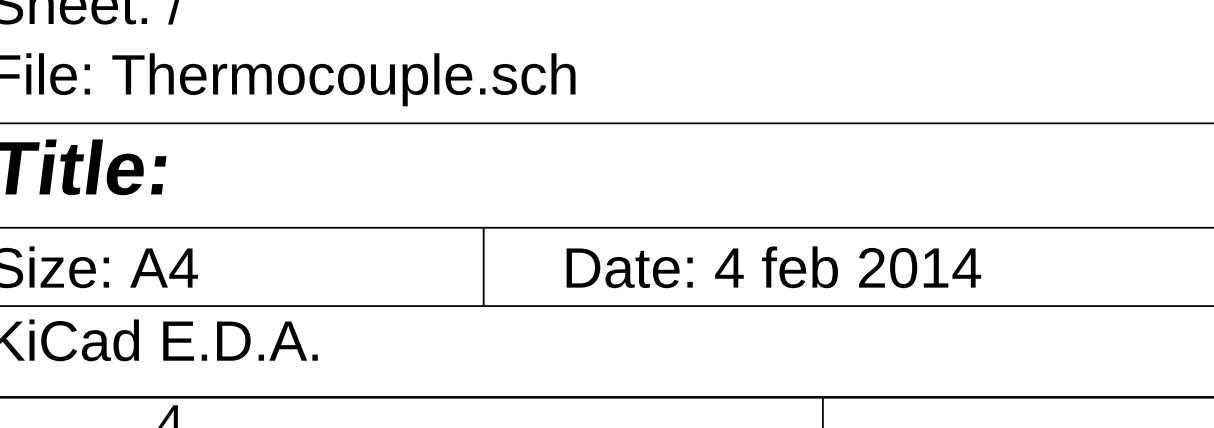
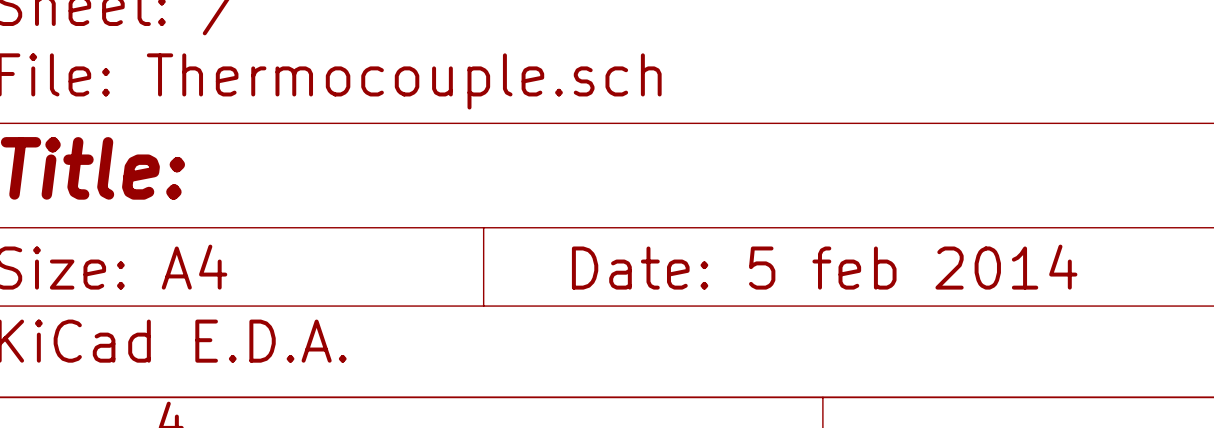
title block: Date: 4 feb 2014 (773, 267) -> Date: 5 feb 2014 (824, 267)

